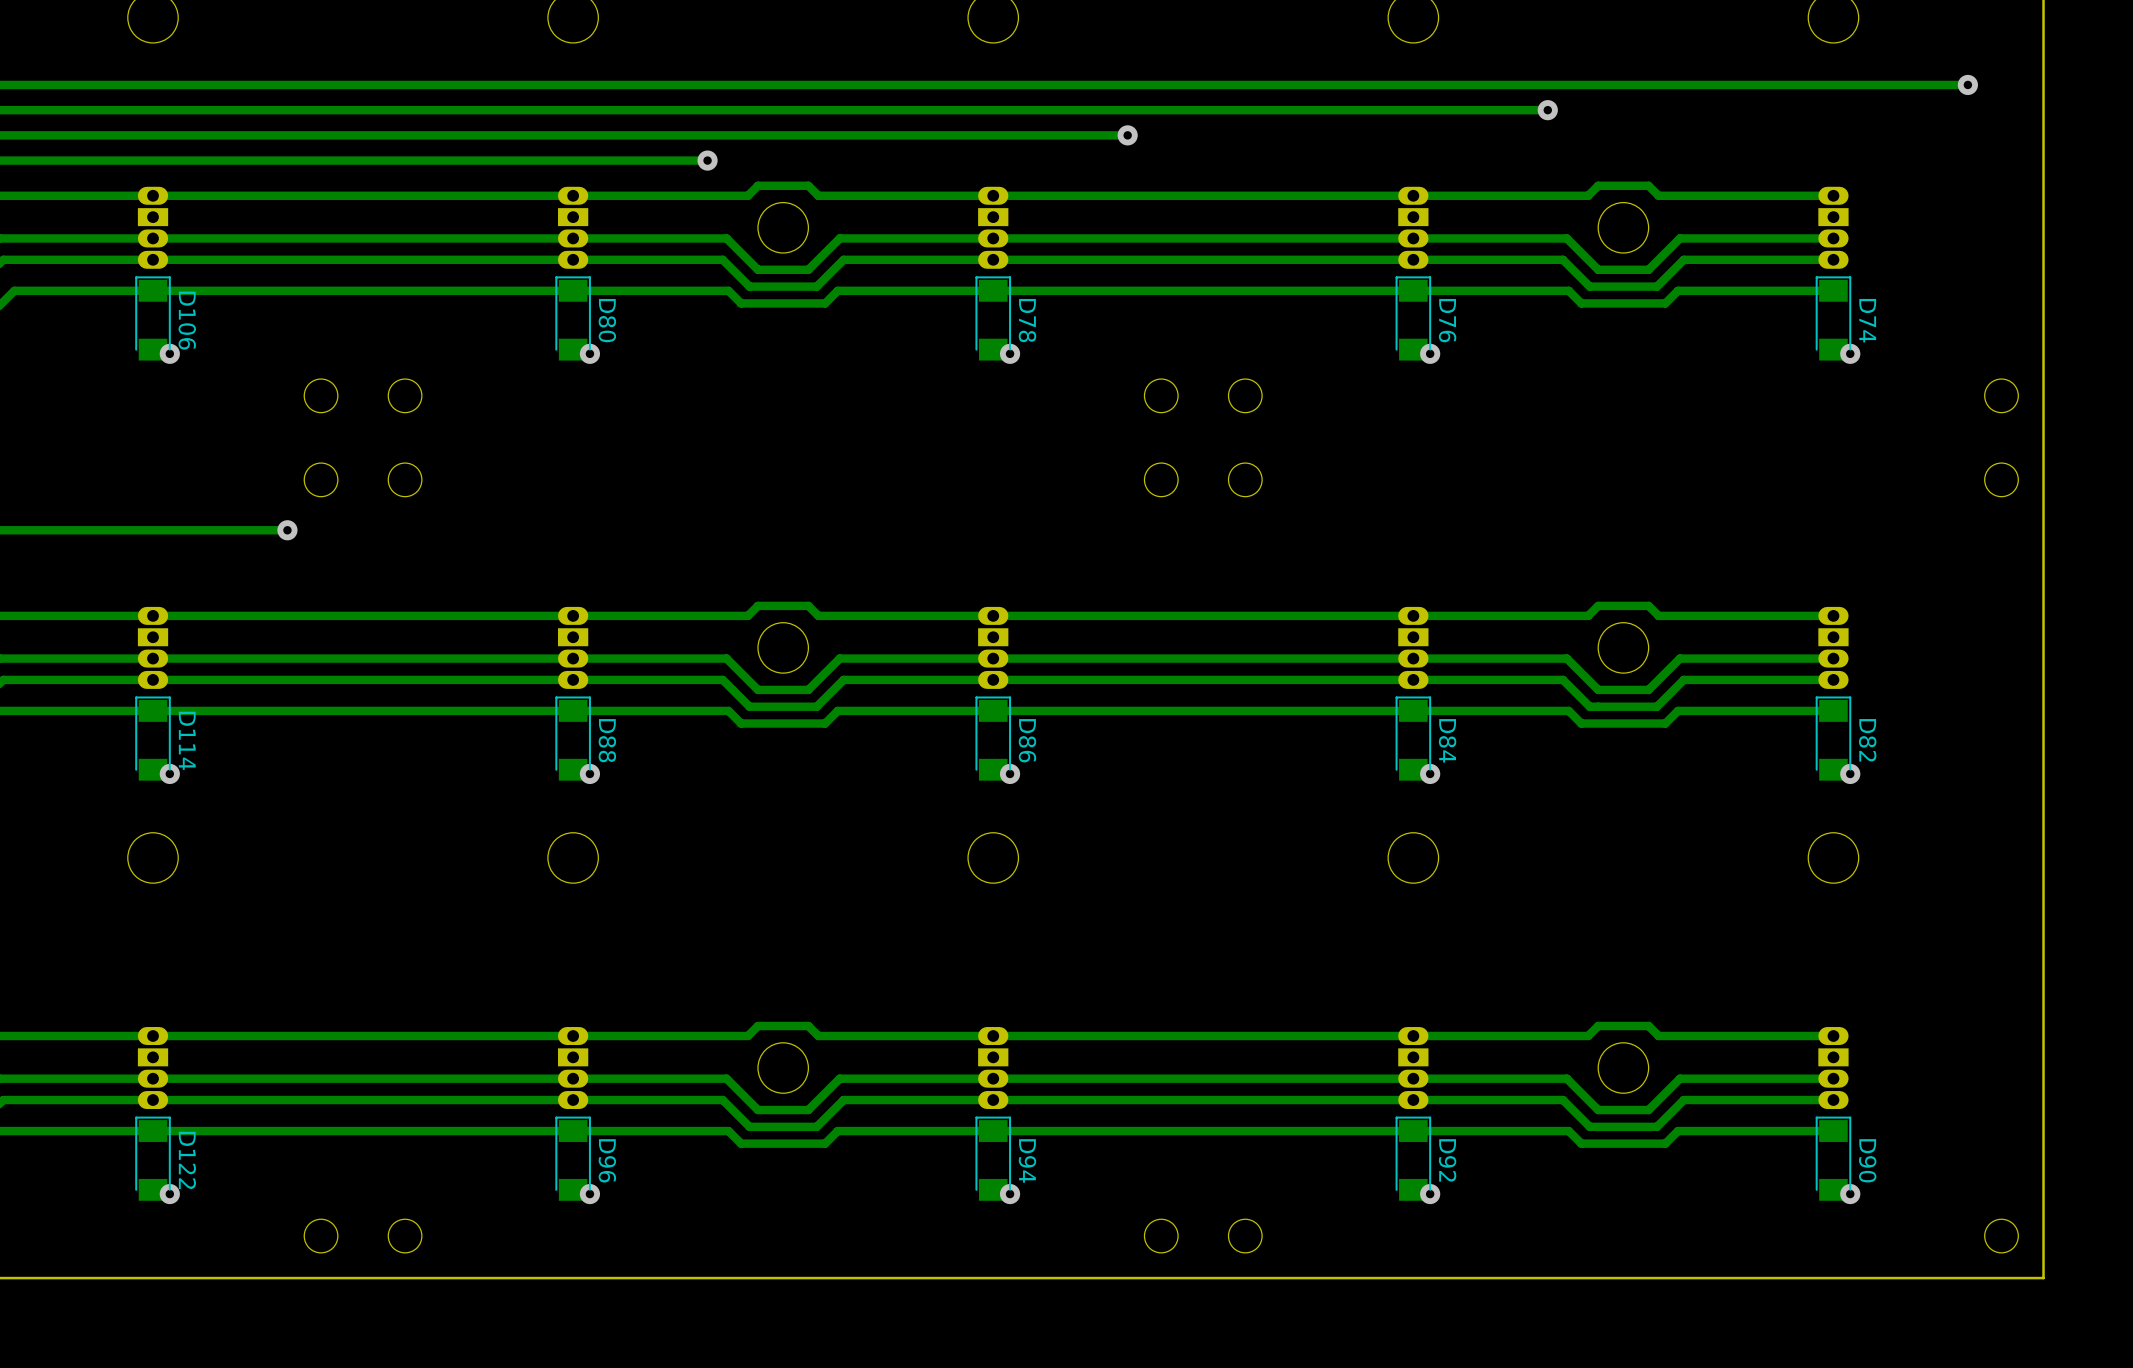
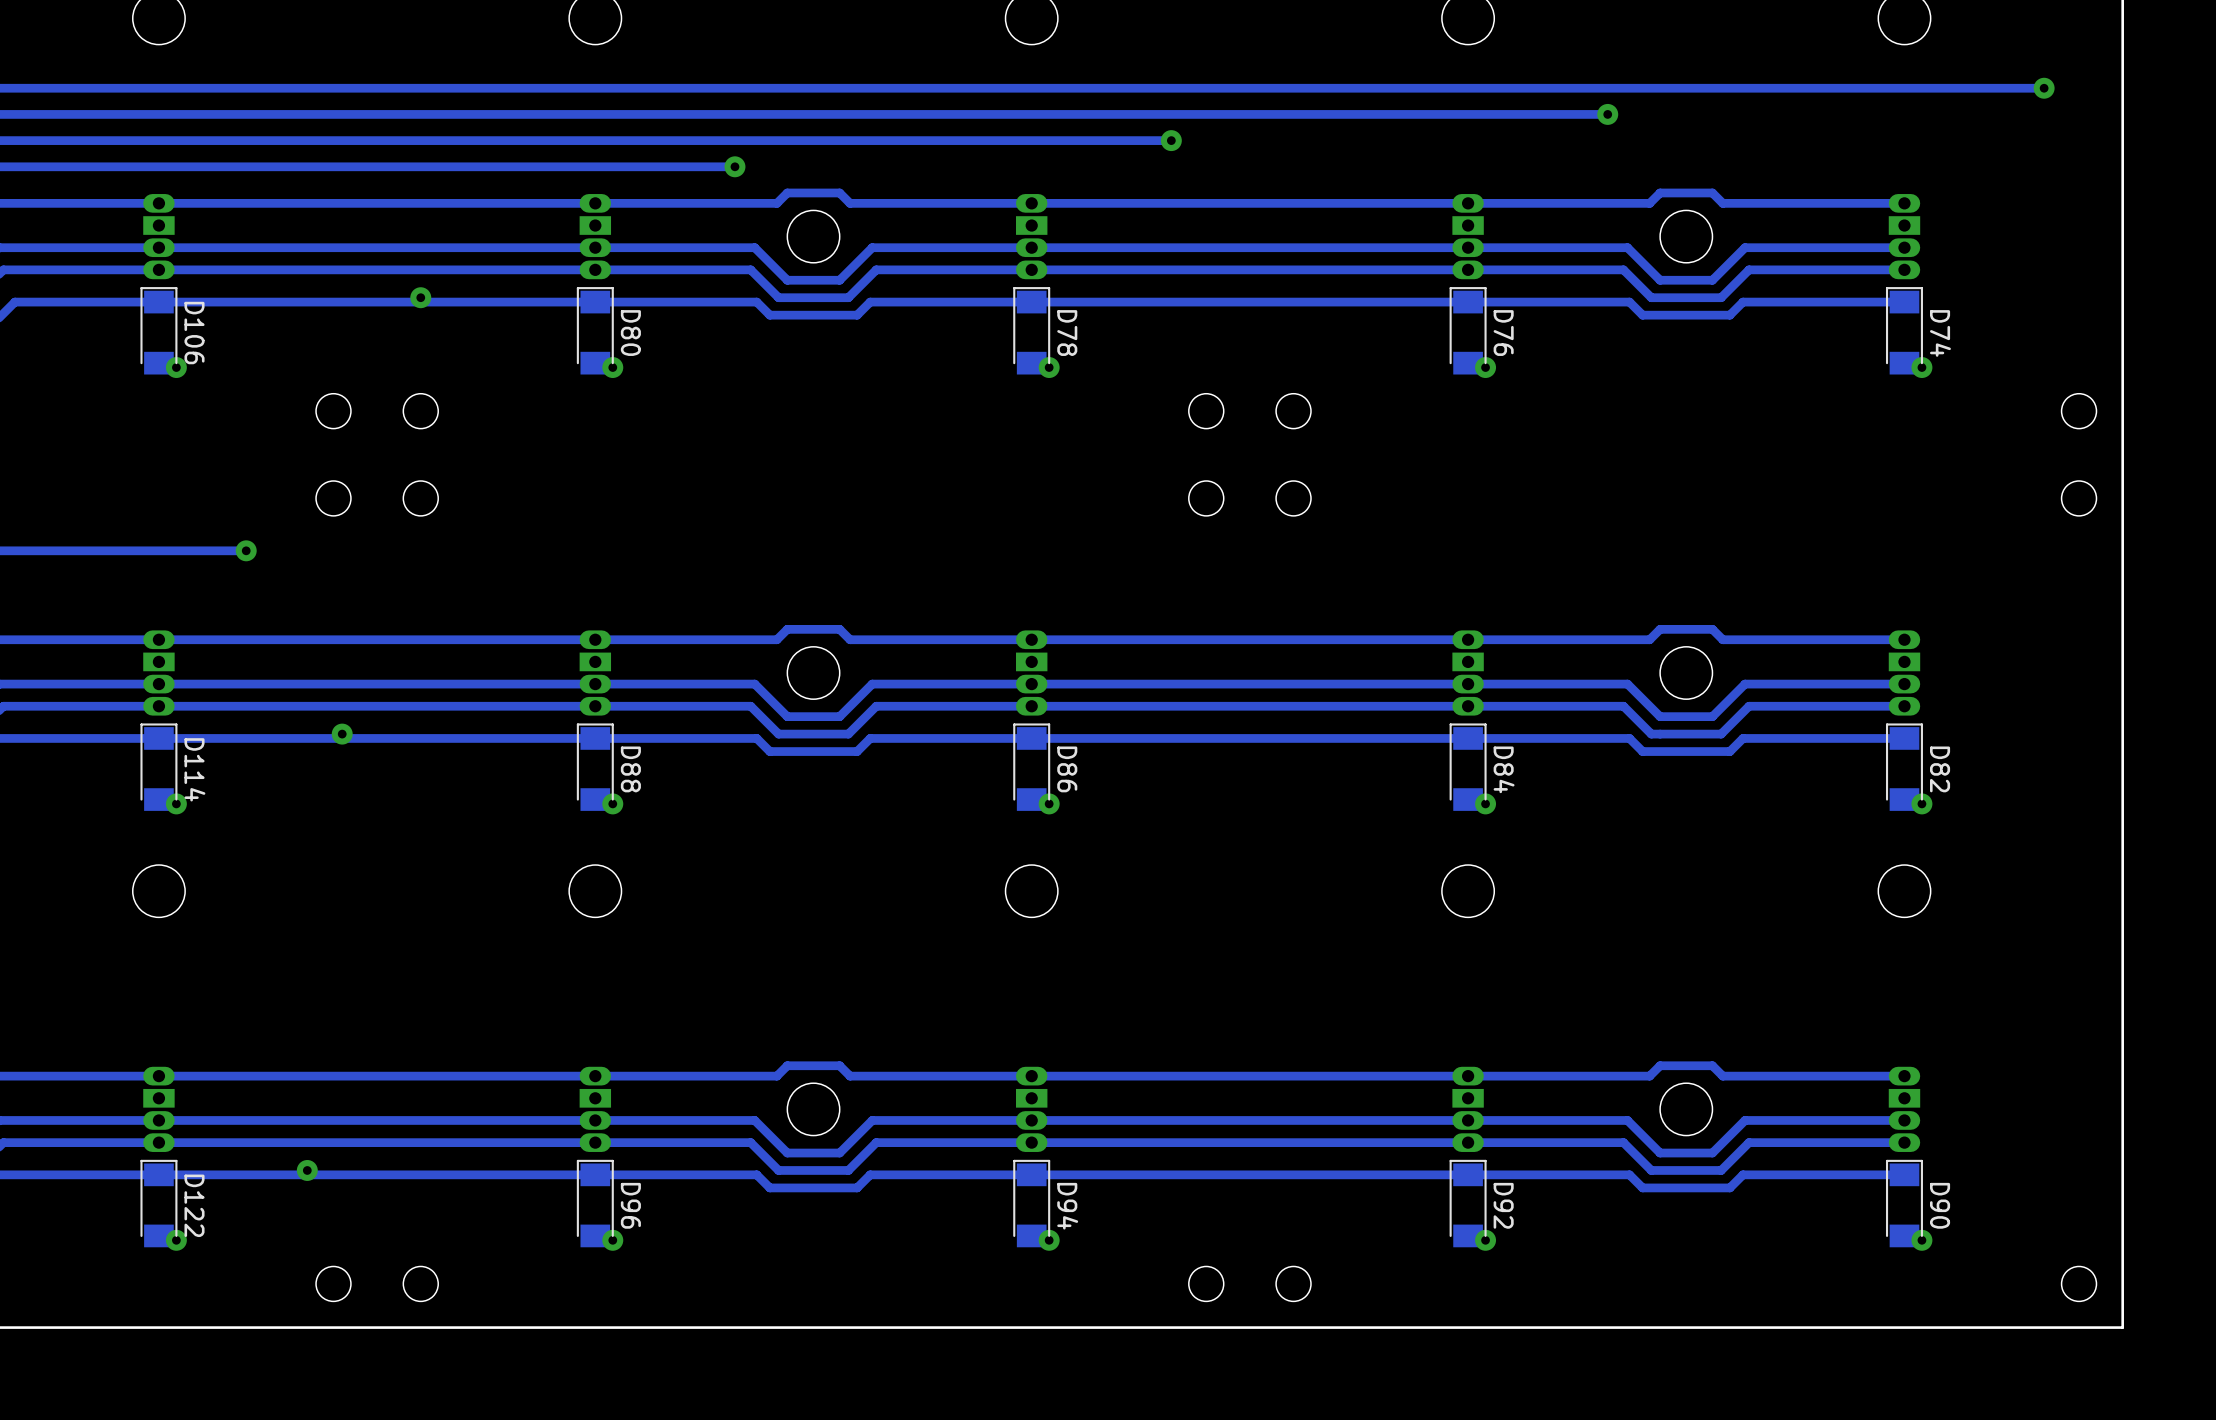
via: none -> (420, 297)
track: (287, 530) (237, 530) -> none
via position: (287, 530) -> (246, 550)
via: none -> (342, 734)
via: none -> (307, 1170)

